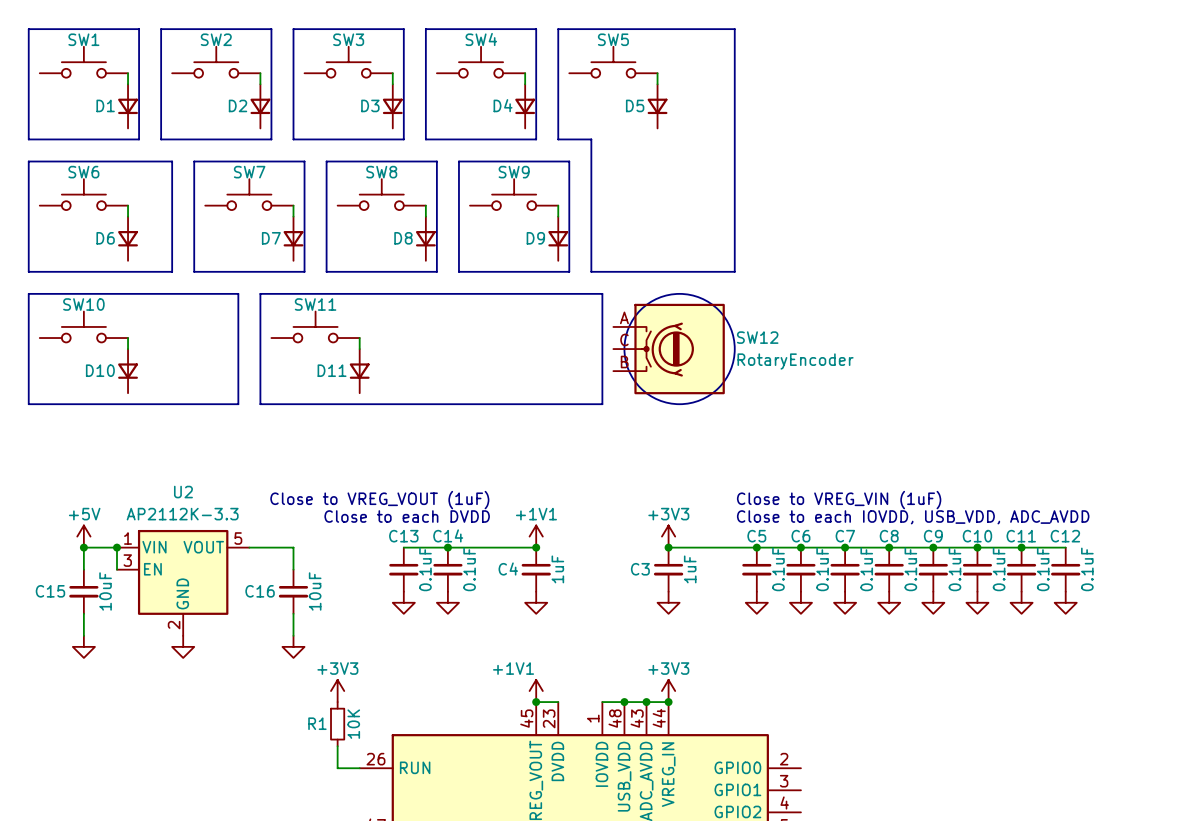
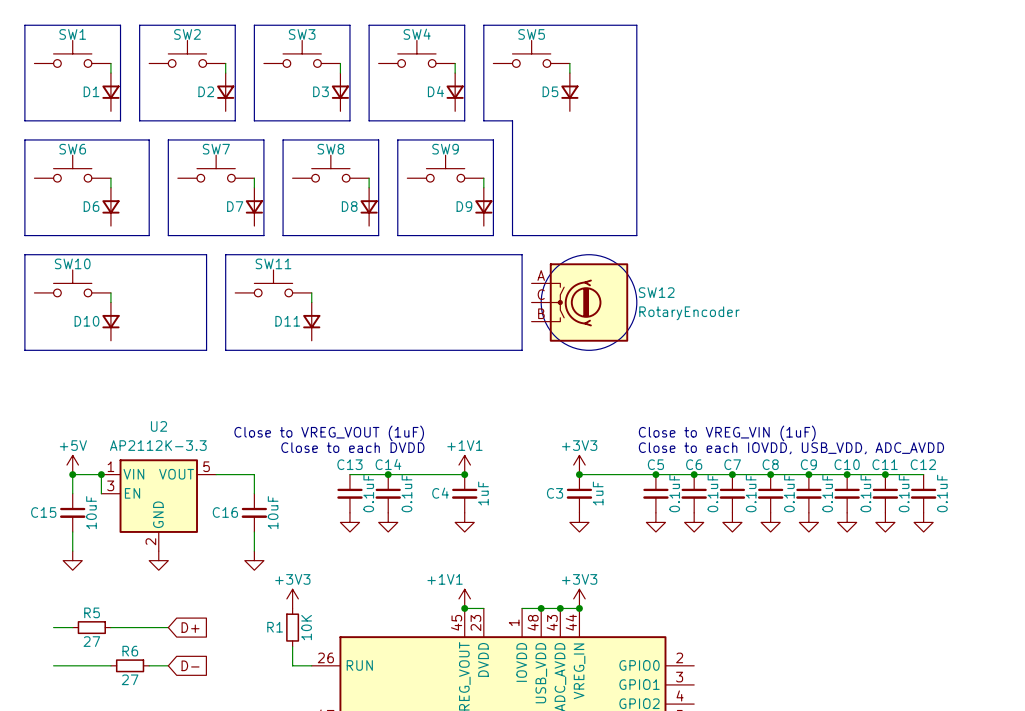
wire: none -> (53, 627) (72, 627)
R5: none -> 27 (91, 627)
wire: none -> (110, 627) (168, 627)
global label: none -> D+ (190, 627)
wire: none -> (53, 665) (110, 665)
R6: none -> 27 (130, 665)
wire: none -> (149, 665) (168, 665)
global label: none -> D- (190, 665)

